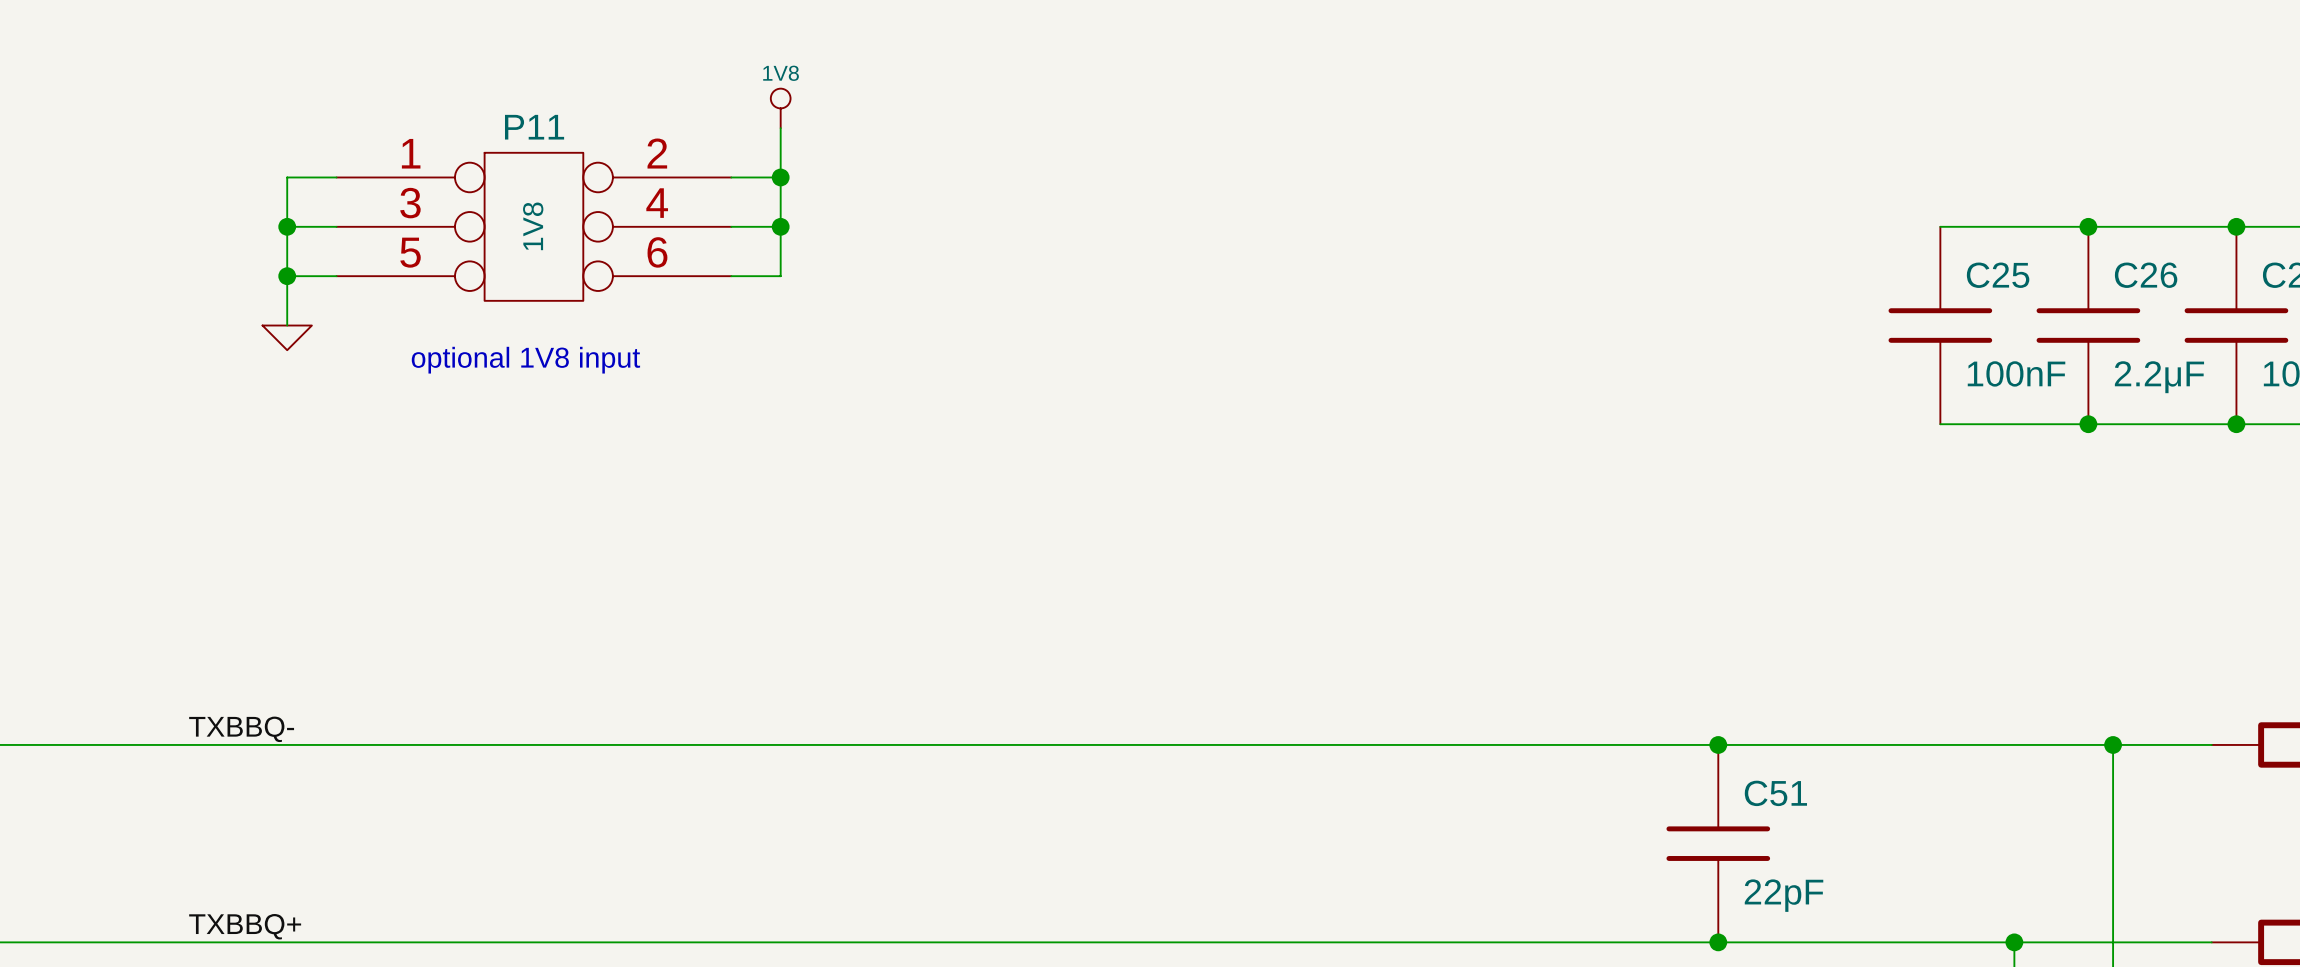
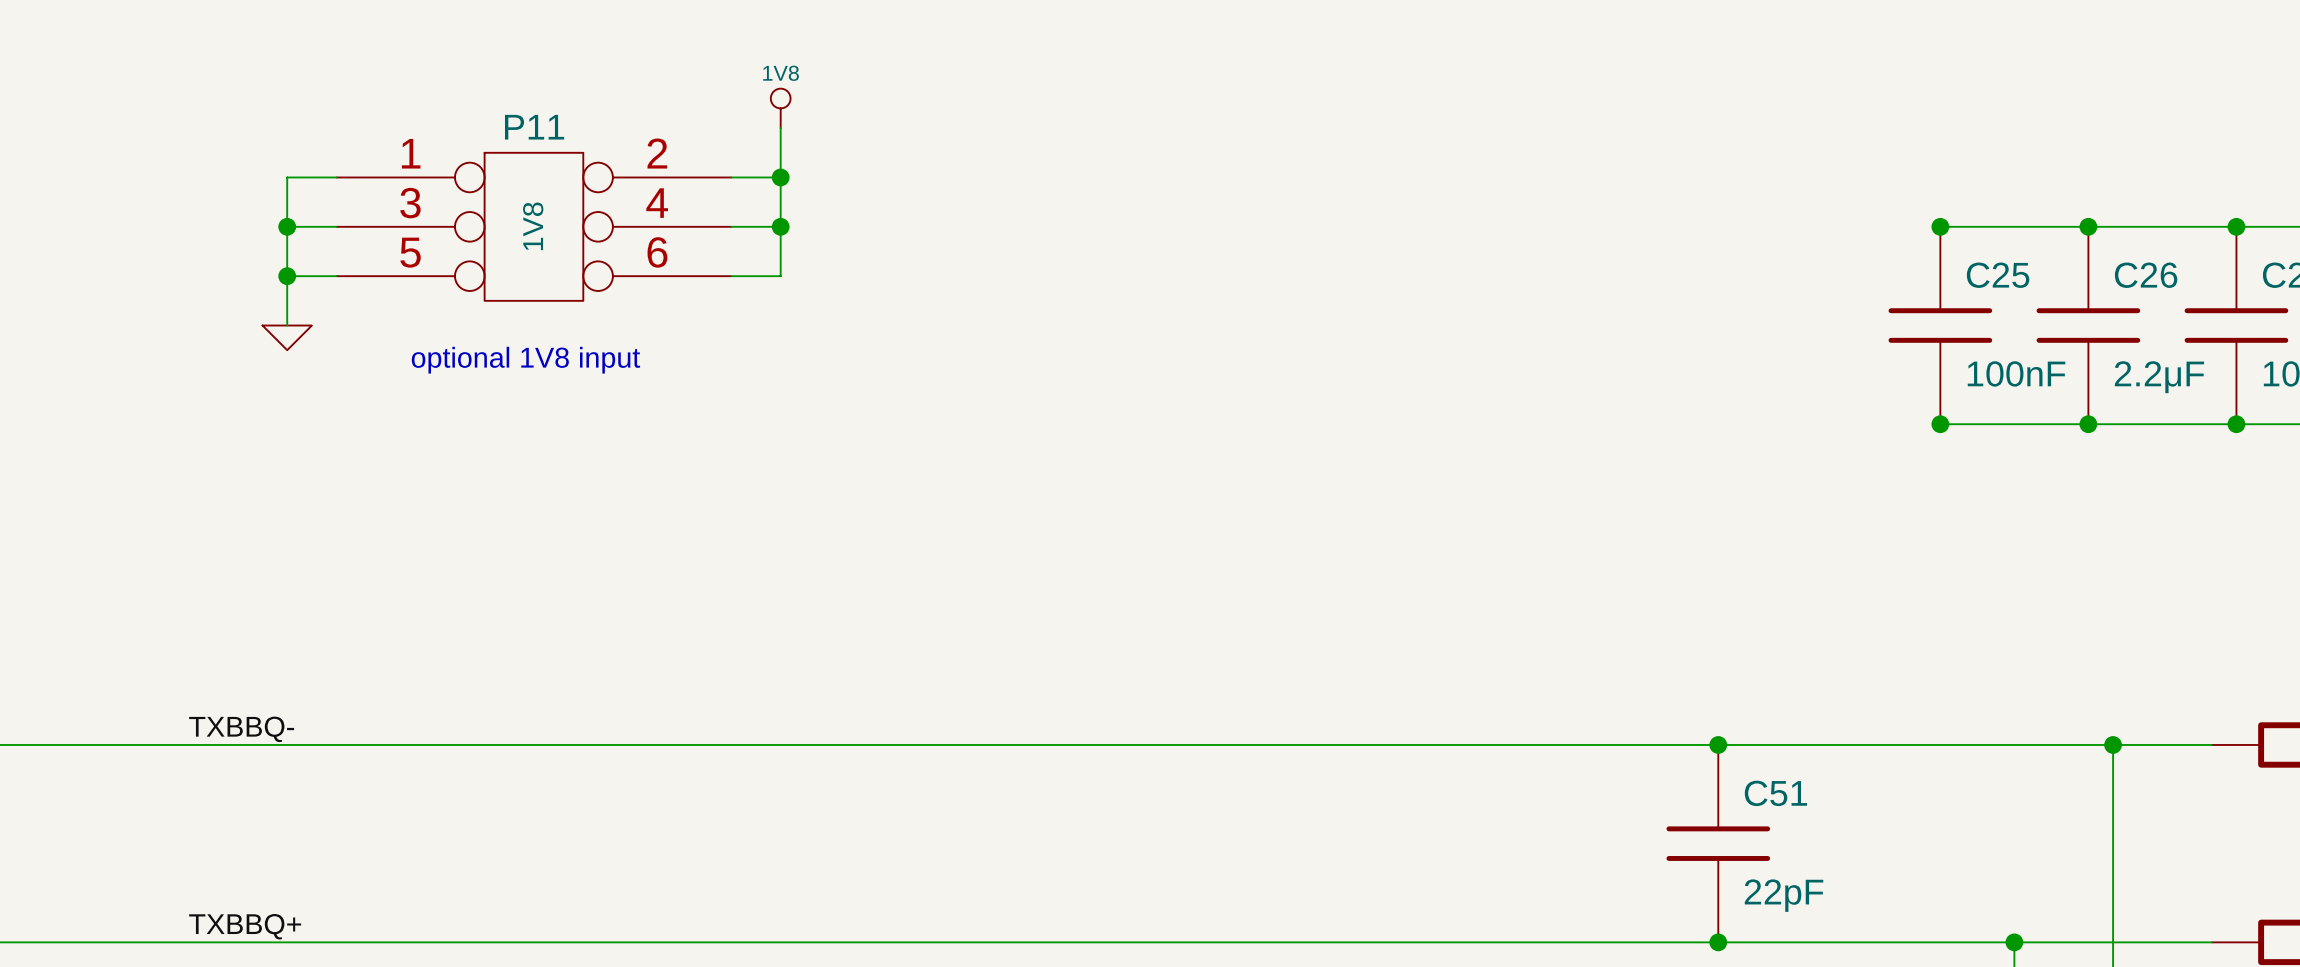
junction: none -> (1940, 226)
junction: none -> (1940, 424)

